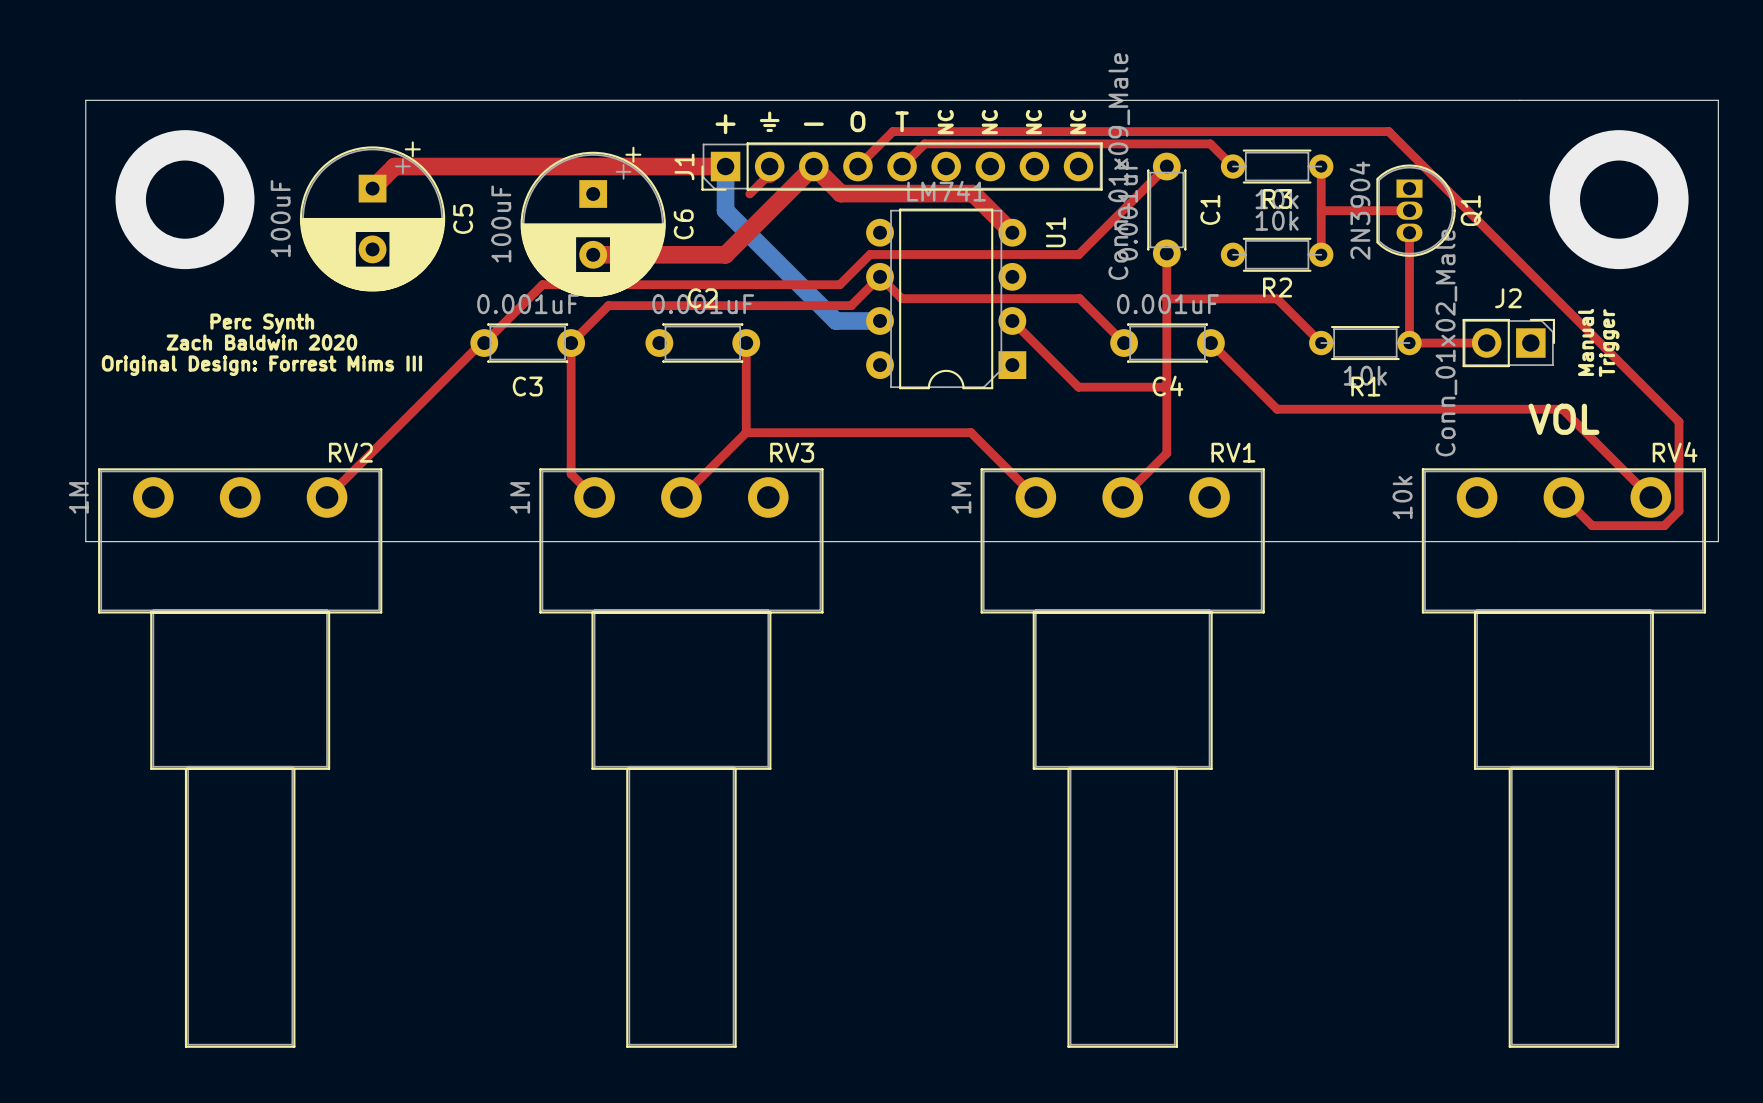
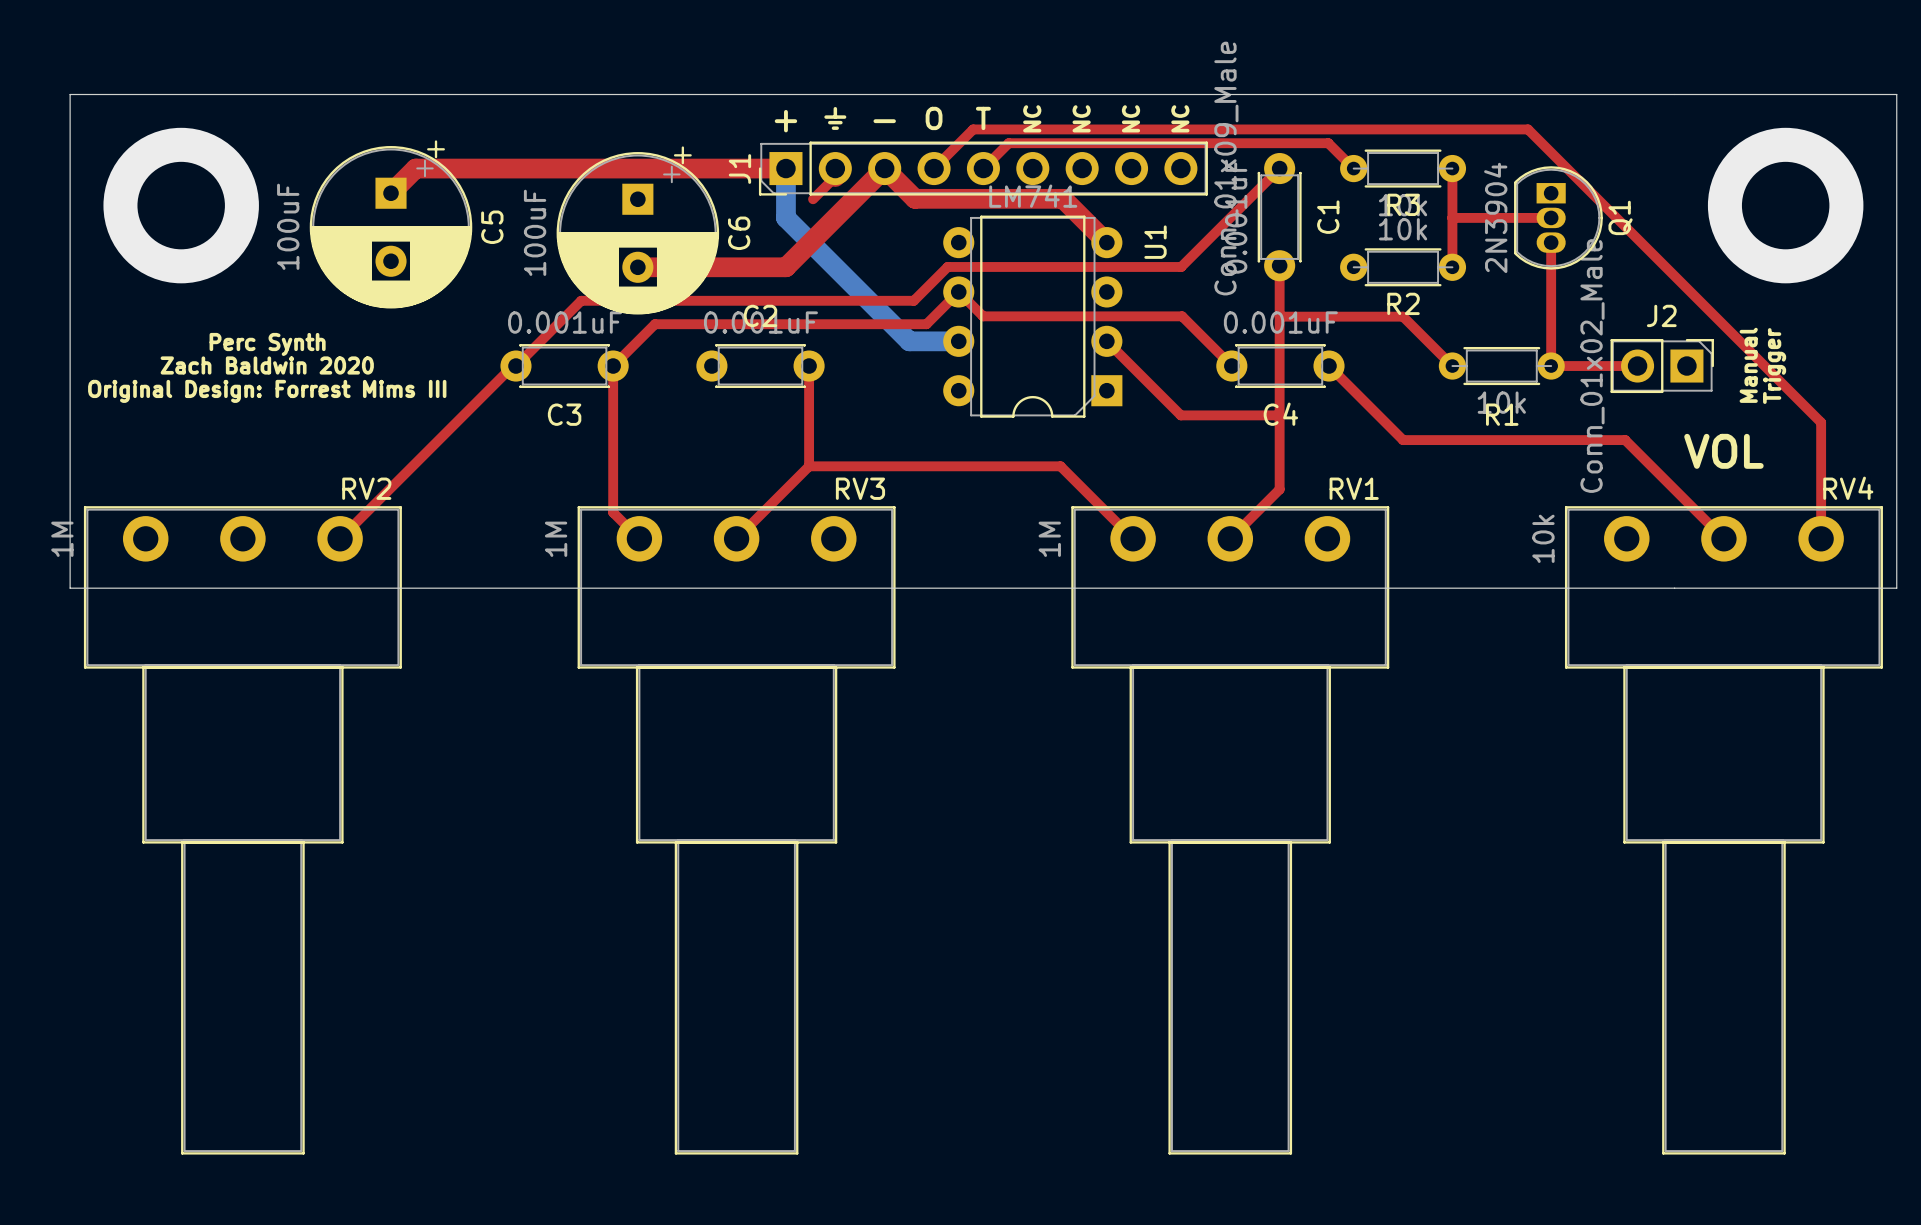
top track: (1650, 393) (1679, 421) (1679, 511) (1664, 525) (1592, 525) (1563, 497) -> (1821, 422) (1821, 538)
top track: (1475, 409) (1562, 409) (1650, 497) -> (1625, 440) (1723, 538)

